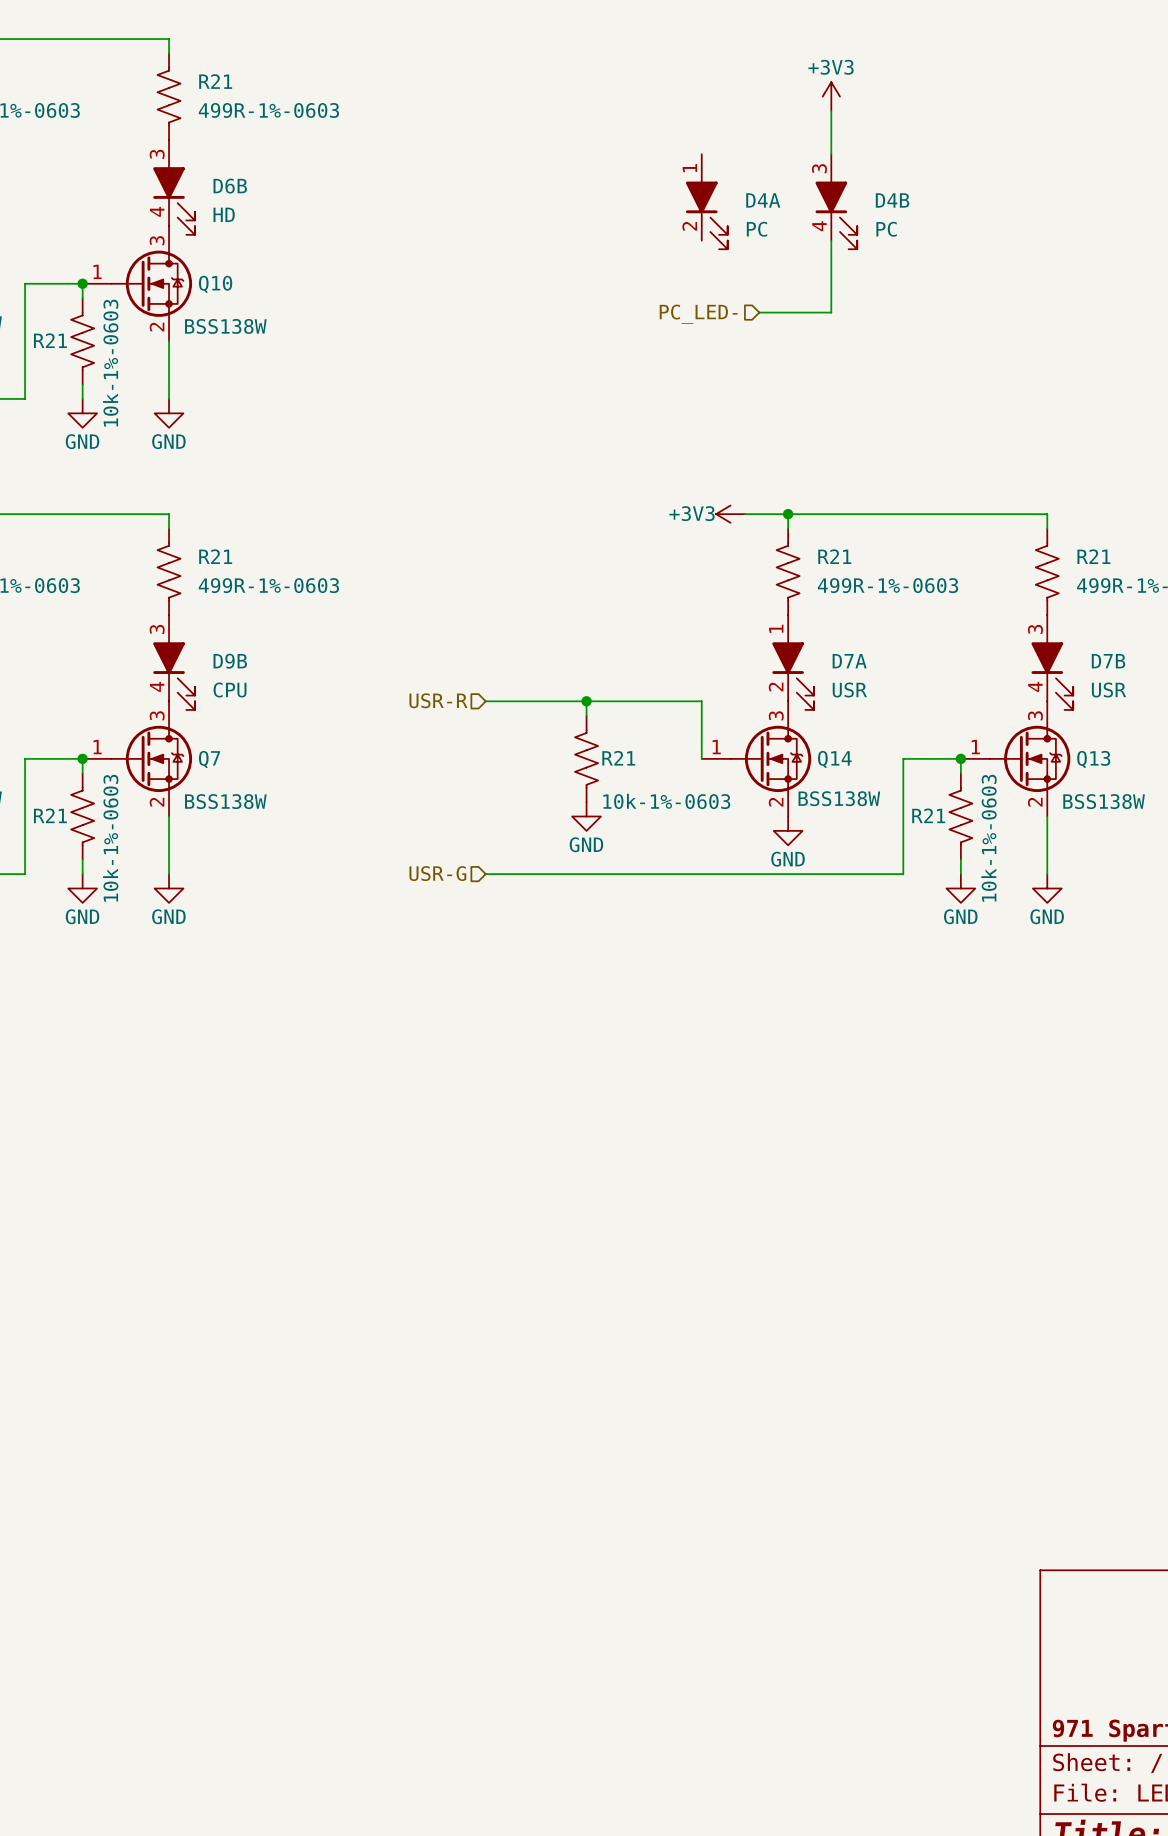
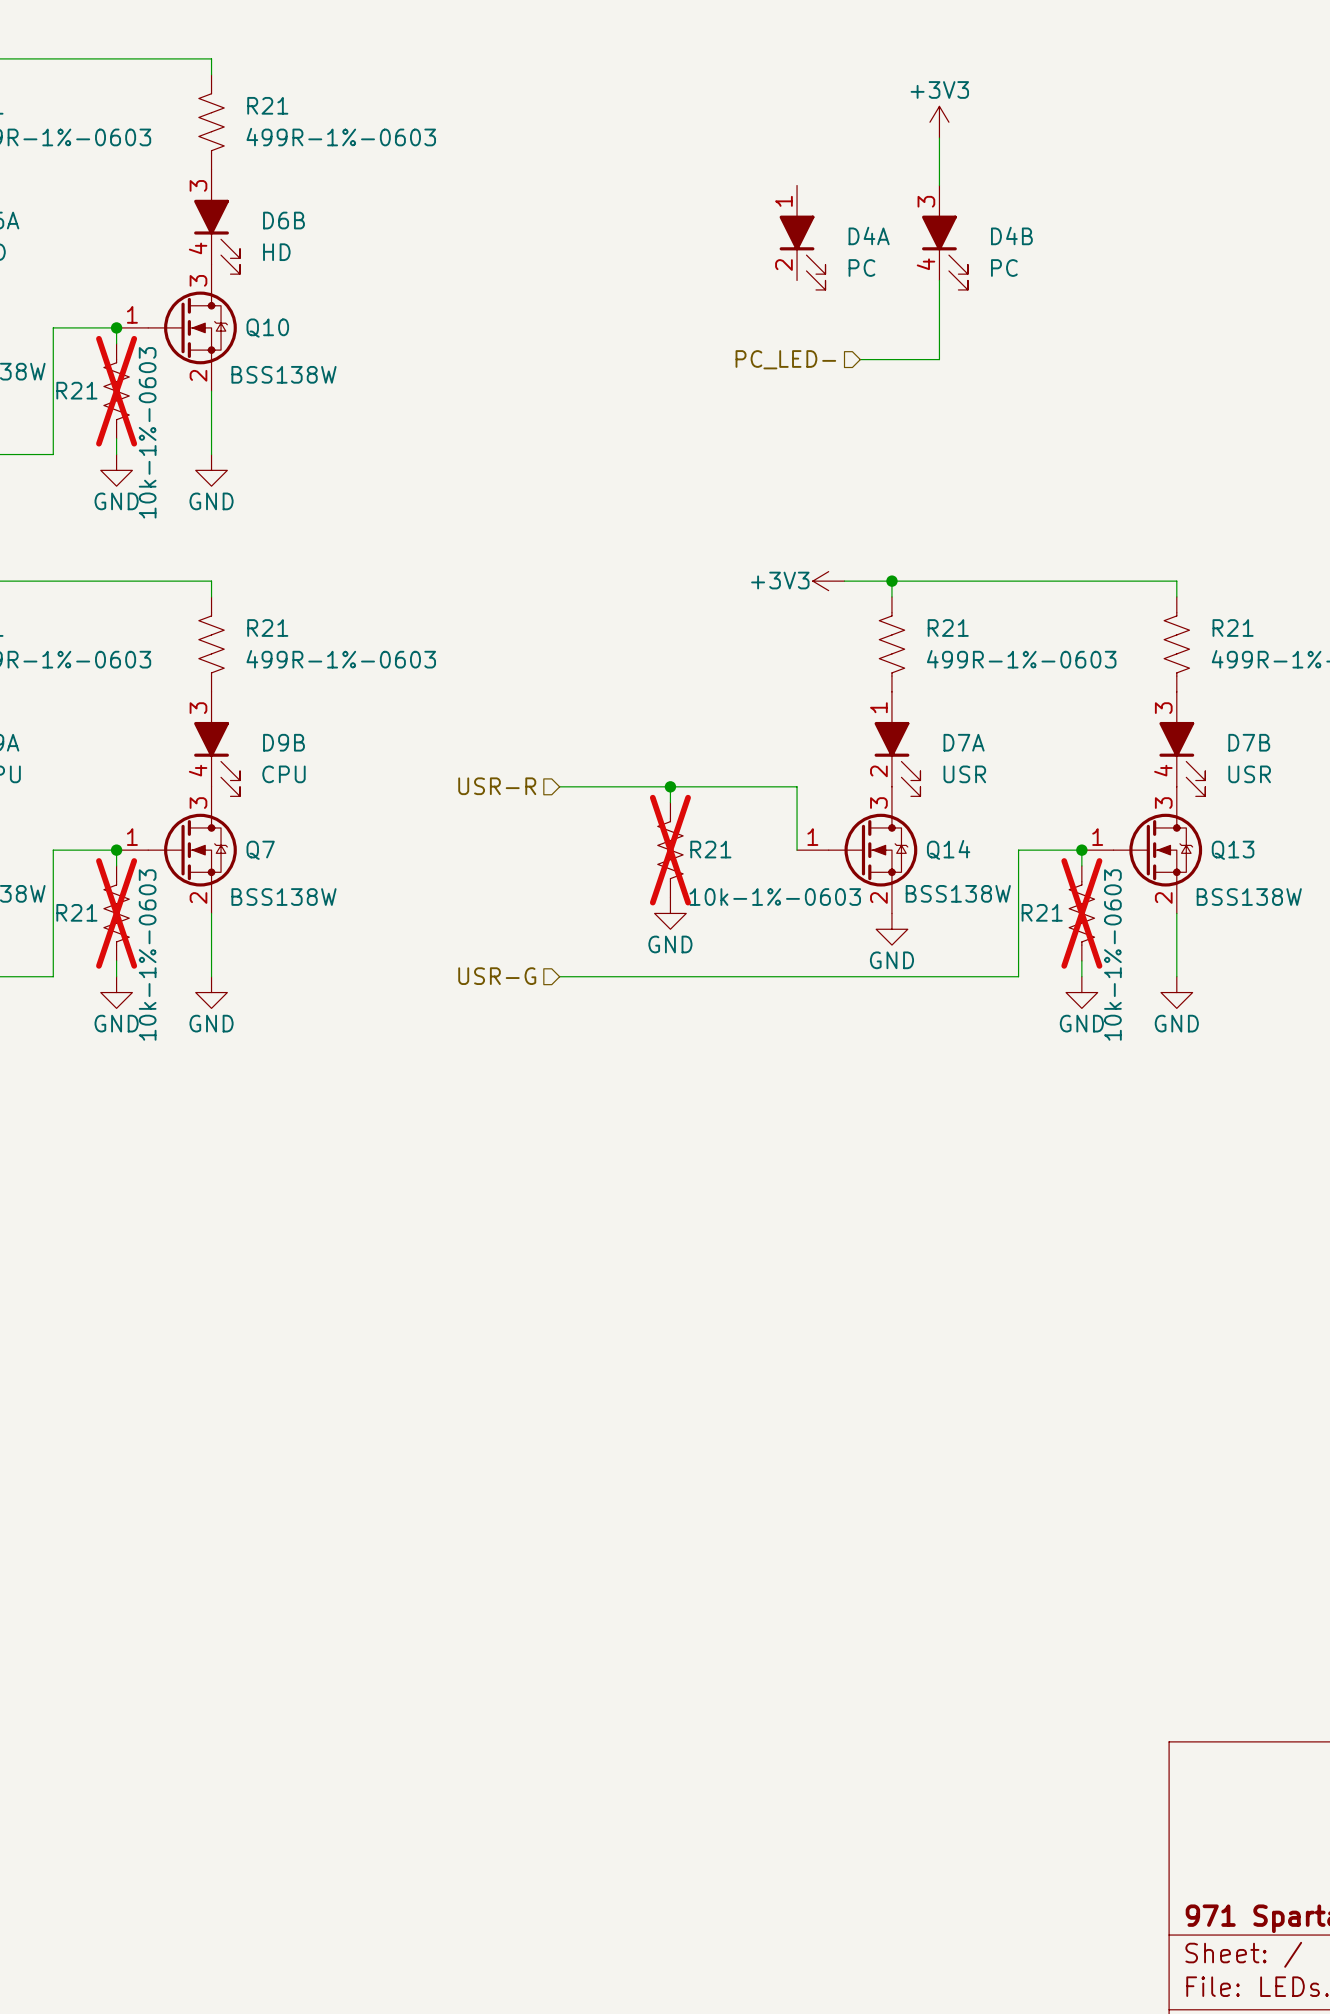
R21 do-not-place cross: none -> (116, 391)
R21 do-not-place cross: none -> (670, 850)
R21 do-not-place cross: none -> (116, 913)
R21 do-not-place cross: none -> (1081, 913)

